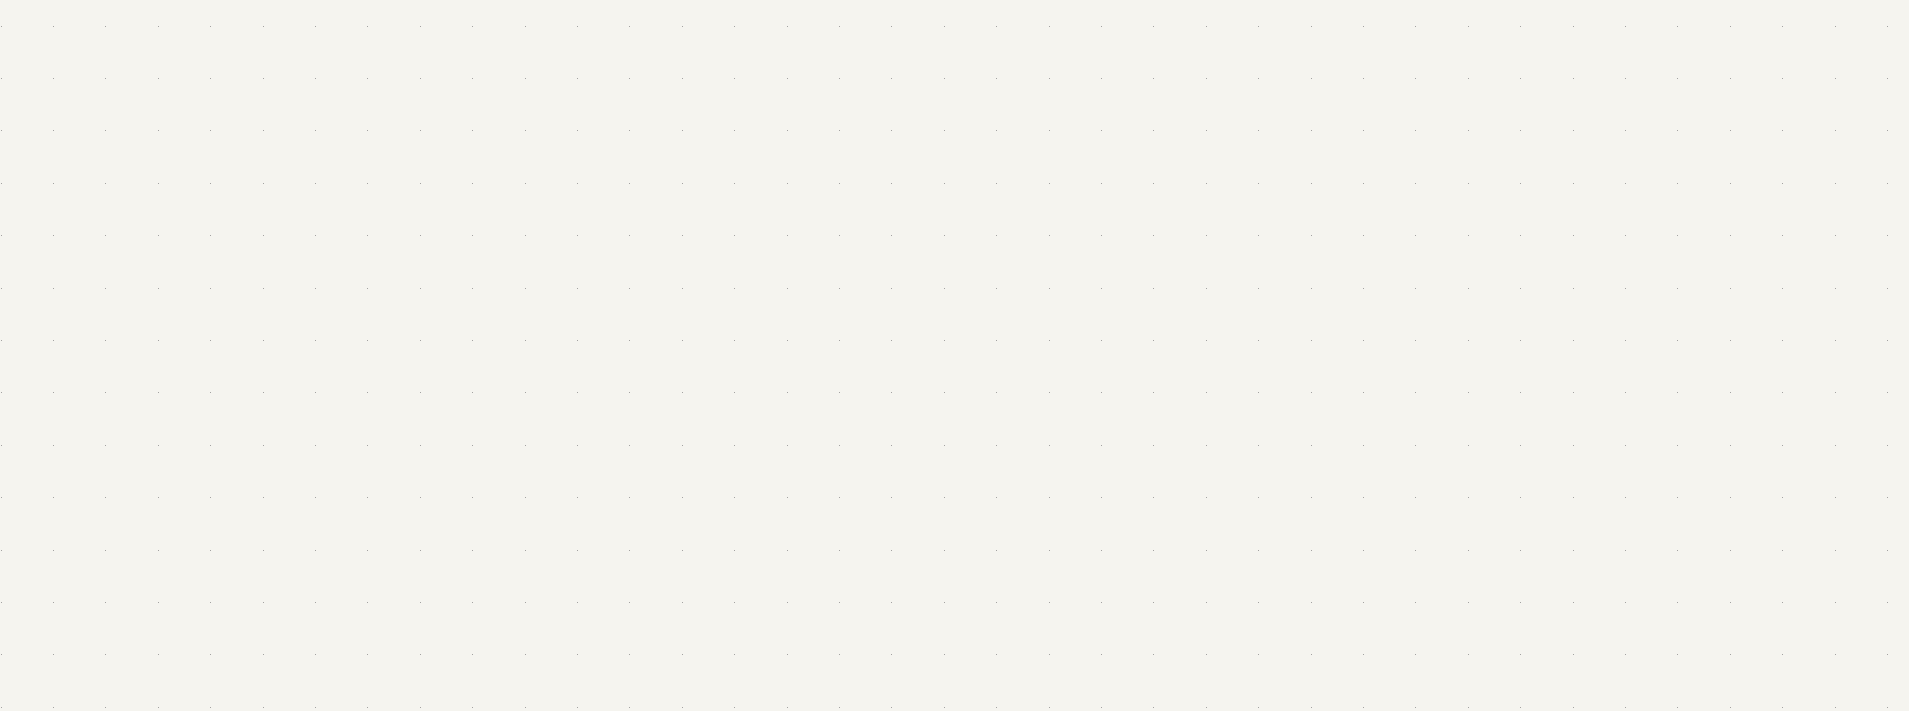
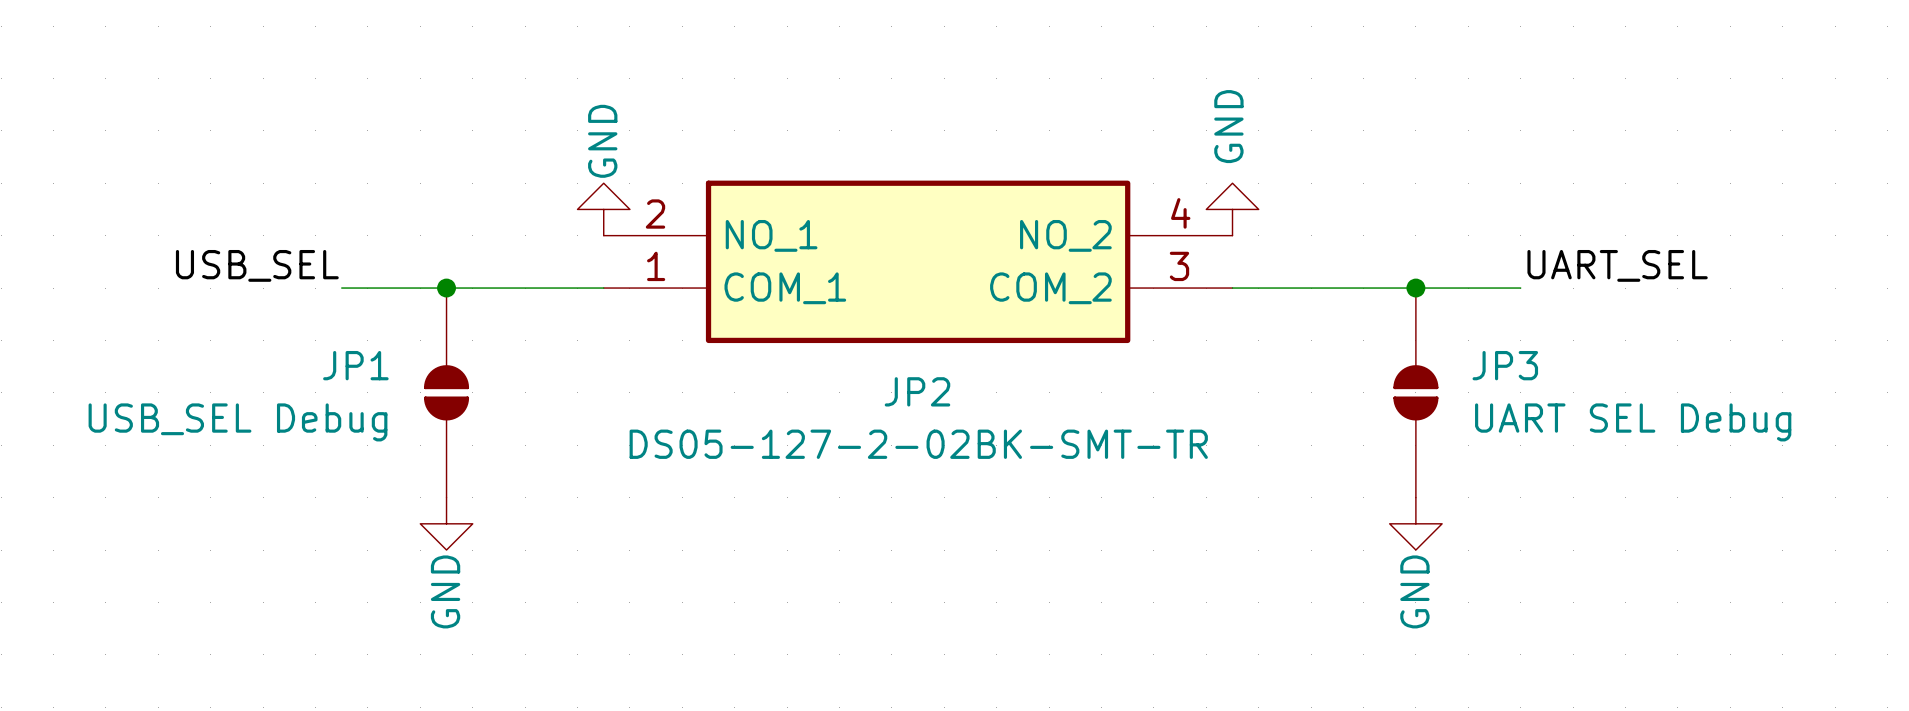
power symbol: none -> GND (603, 209)
power symbol: none -> GND (1232, 209)
JP2: none -> DS05-127-2-02BK-SMT-TR (918, 261)
label: none -> USB_SEL (257, 265)
label: none -> UART_SEL (1617, 265)
wire: none -> (341, 288) (603, 288)
junction: none -> (446, 288)
wire: none -> (1232, 288) (1520, 288)
junction: none -> (1415, 288)
JP1: none -> USB_SEL Debug (446, 392)
JP3: none -> UART SEL Debug (1415, 392)
power symbol: none -> GND (446, 523)
power symbol: none -> GND (1415, 523)

